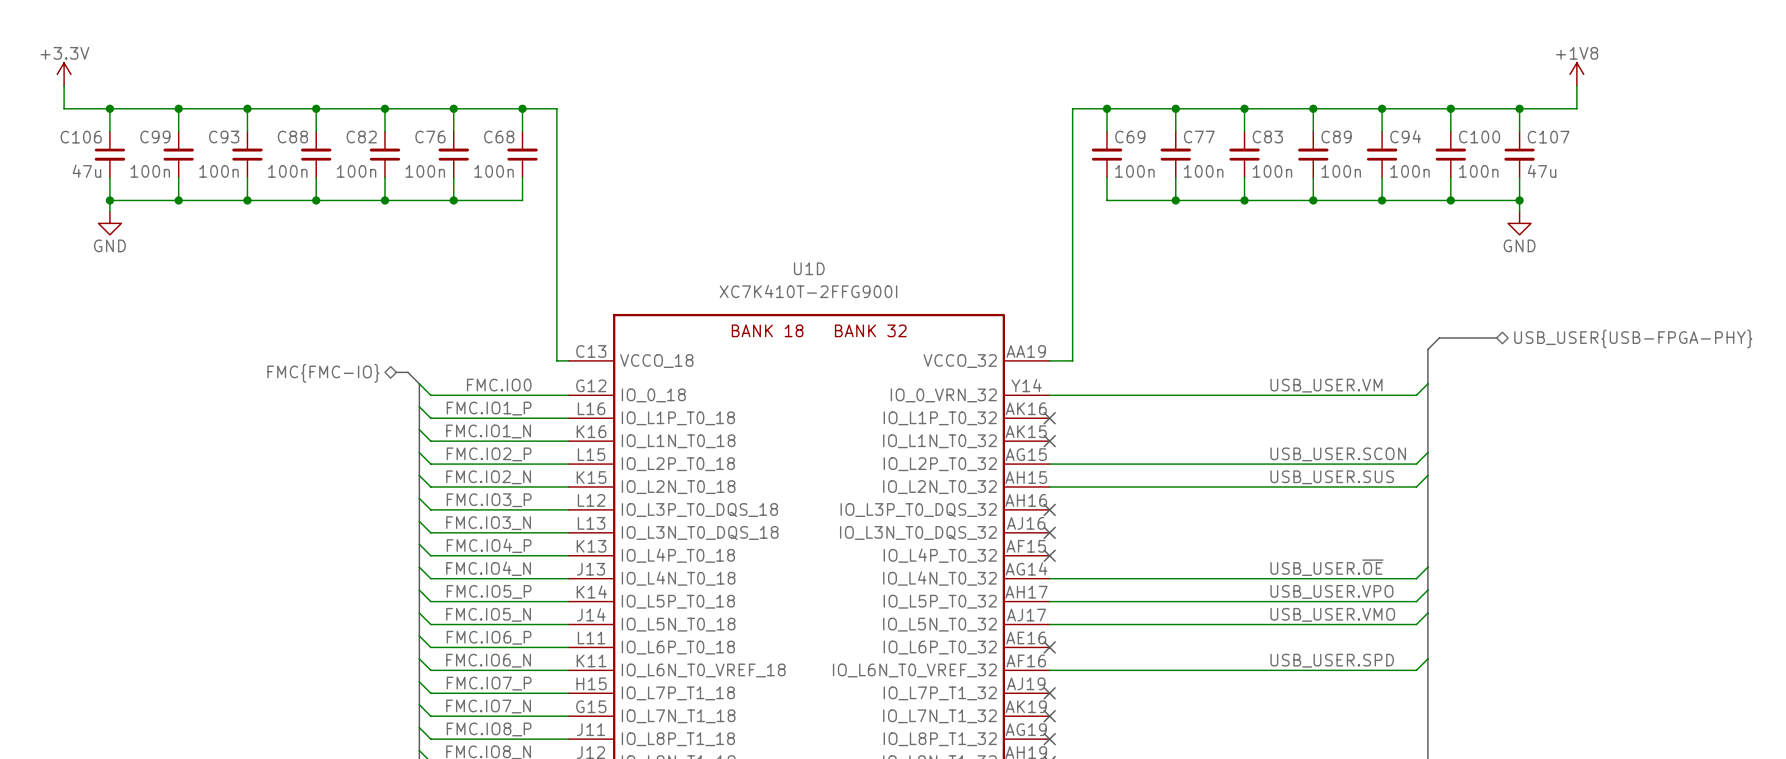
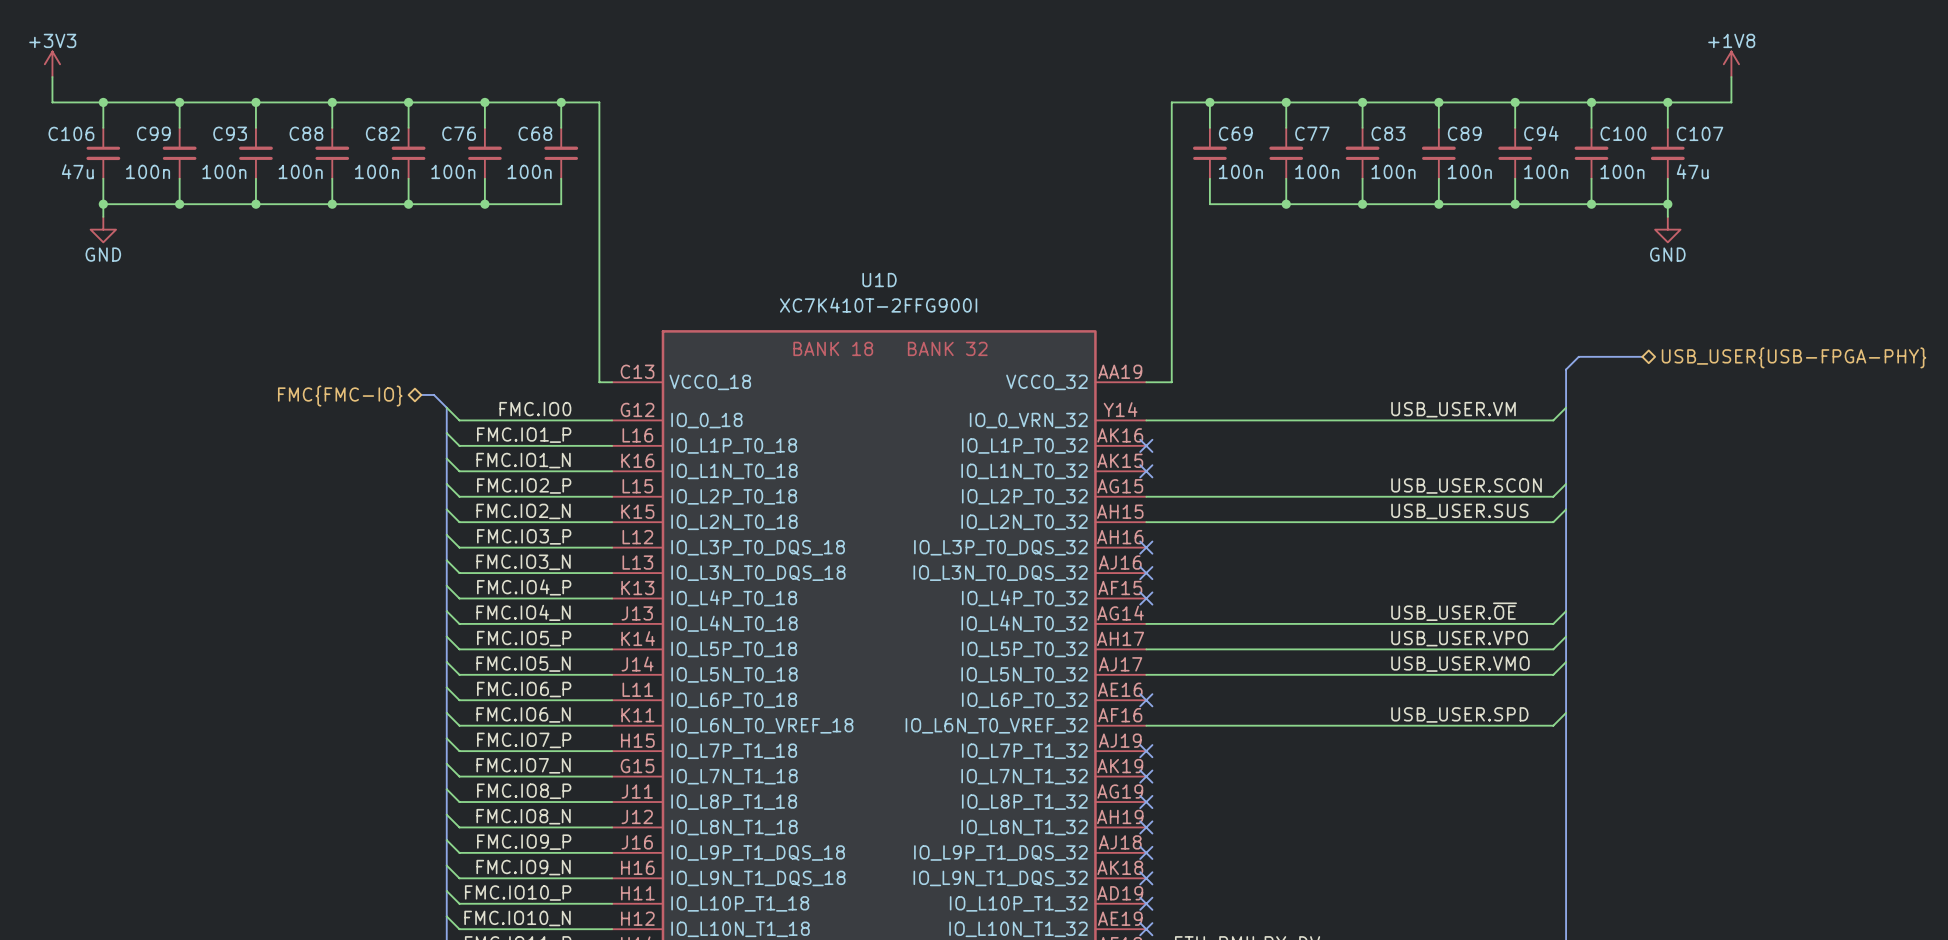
power symbol: +3.3V (64, 74) -> +3V3 (52, 64)

